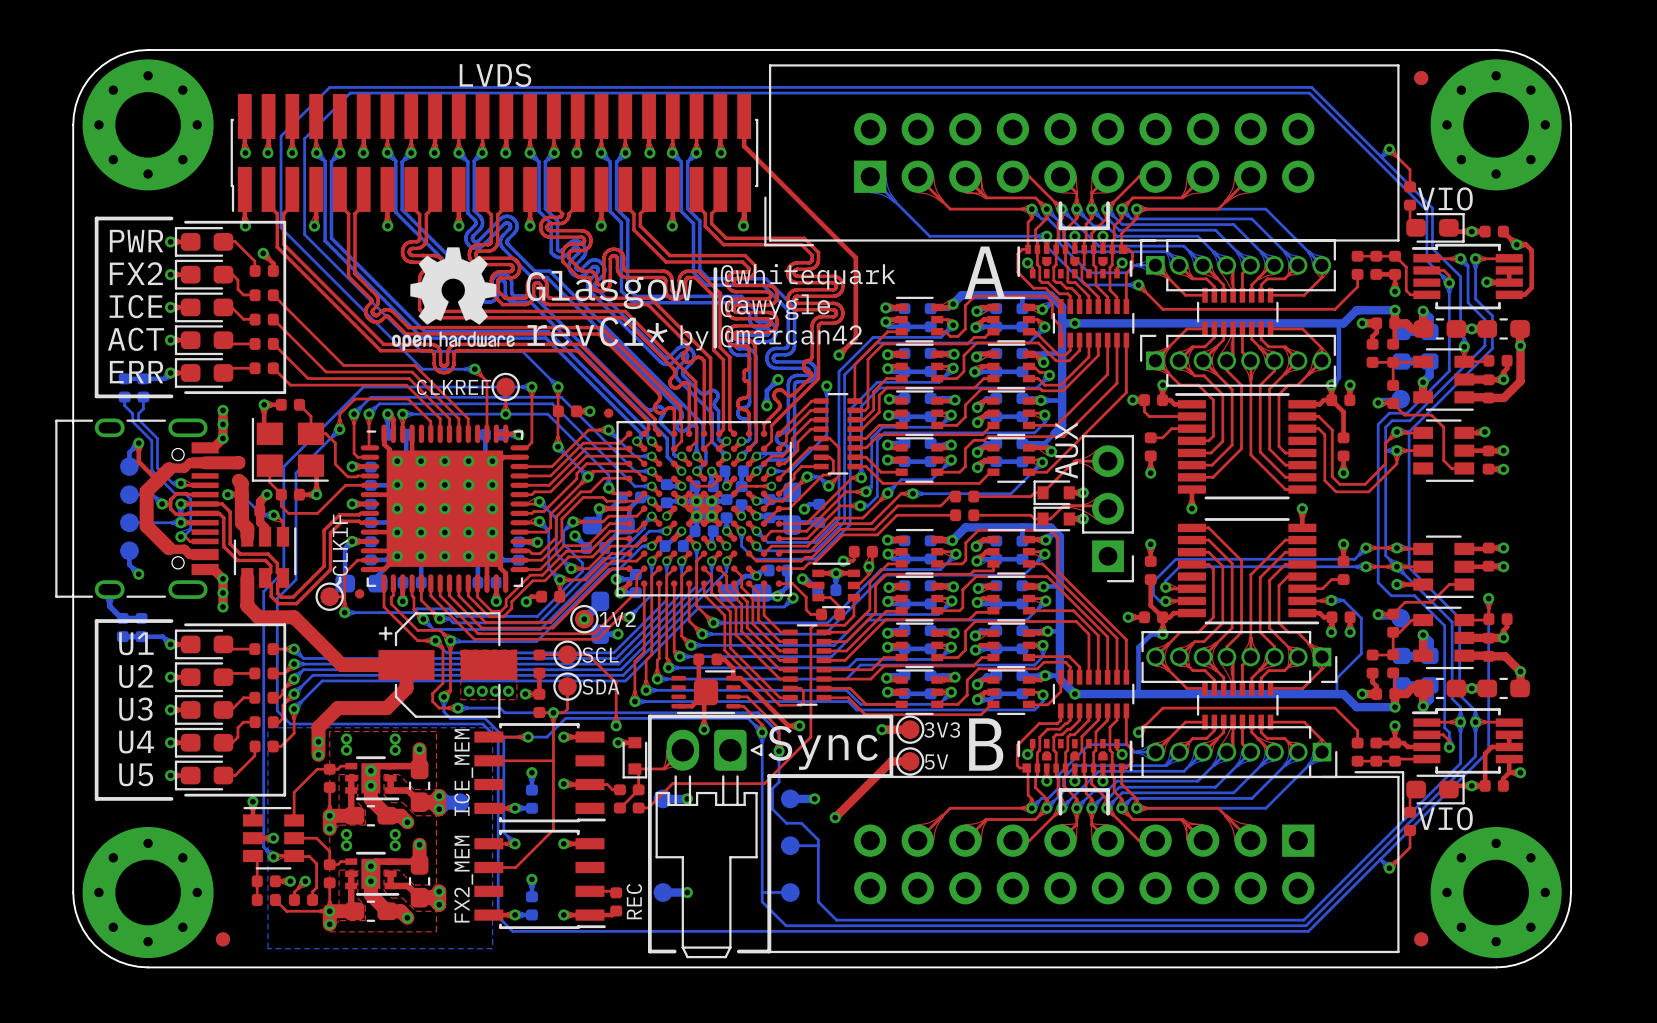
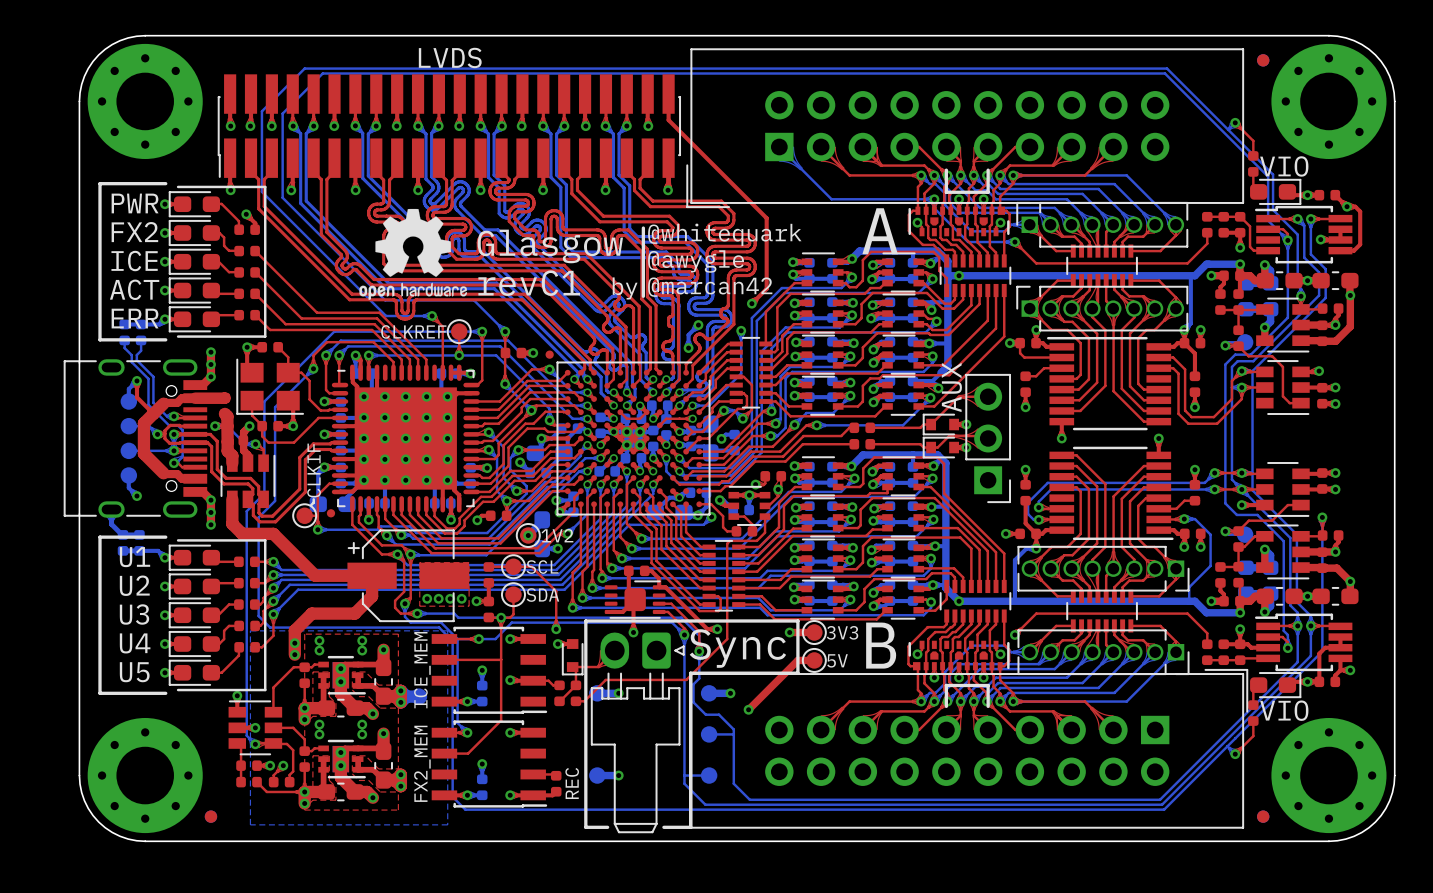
text: revC1* (597, 331) -> revC1 (529, 283)

